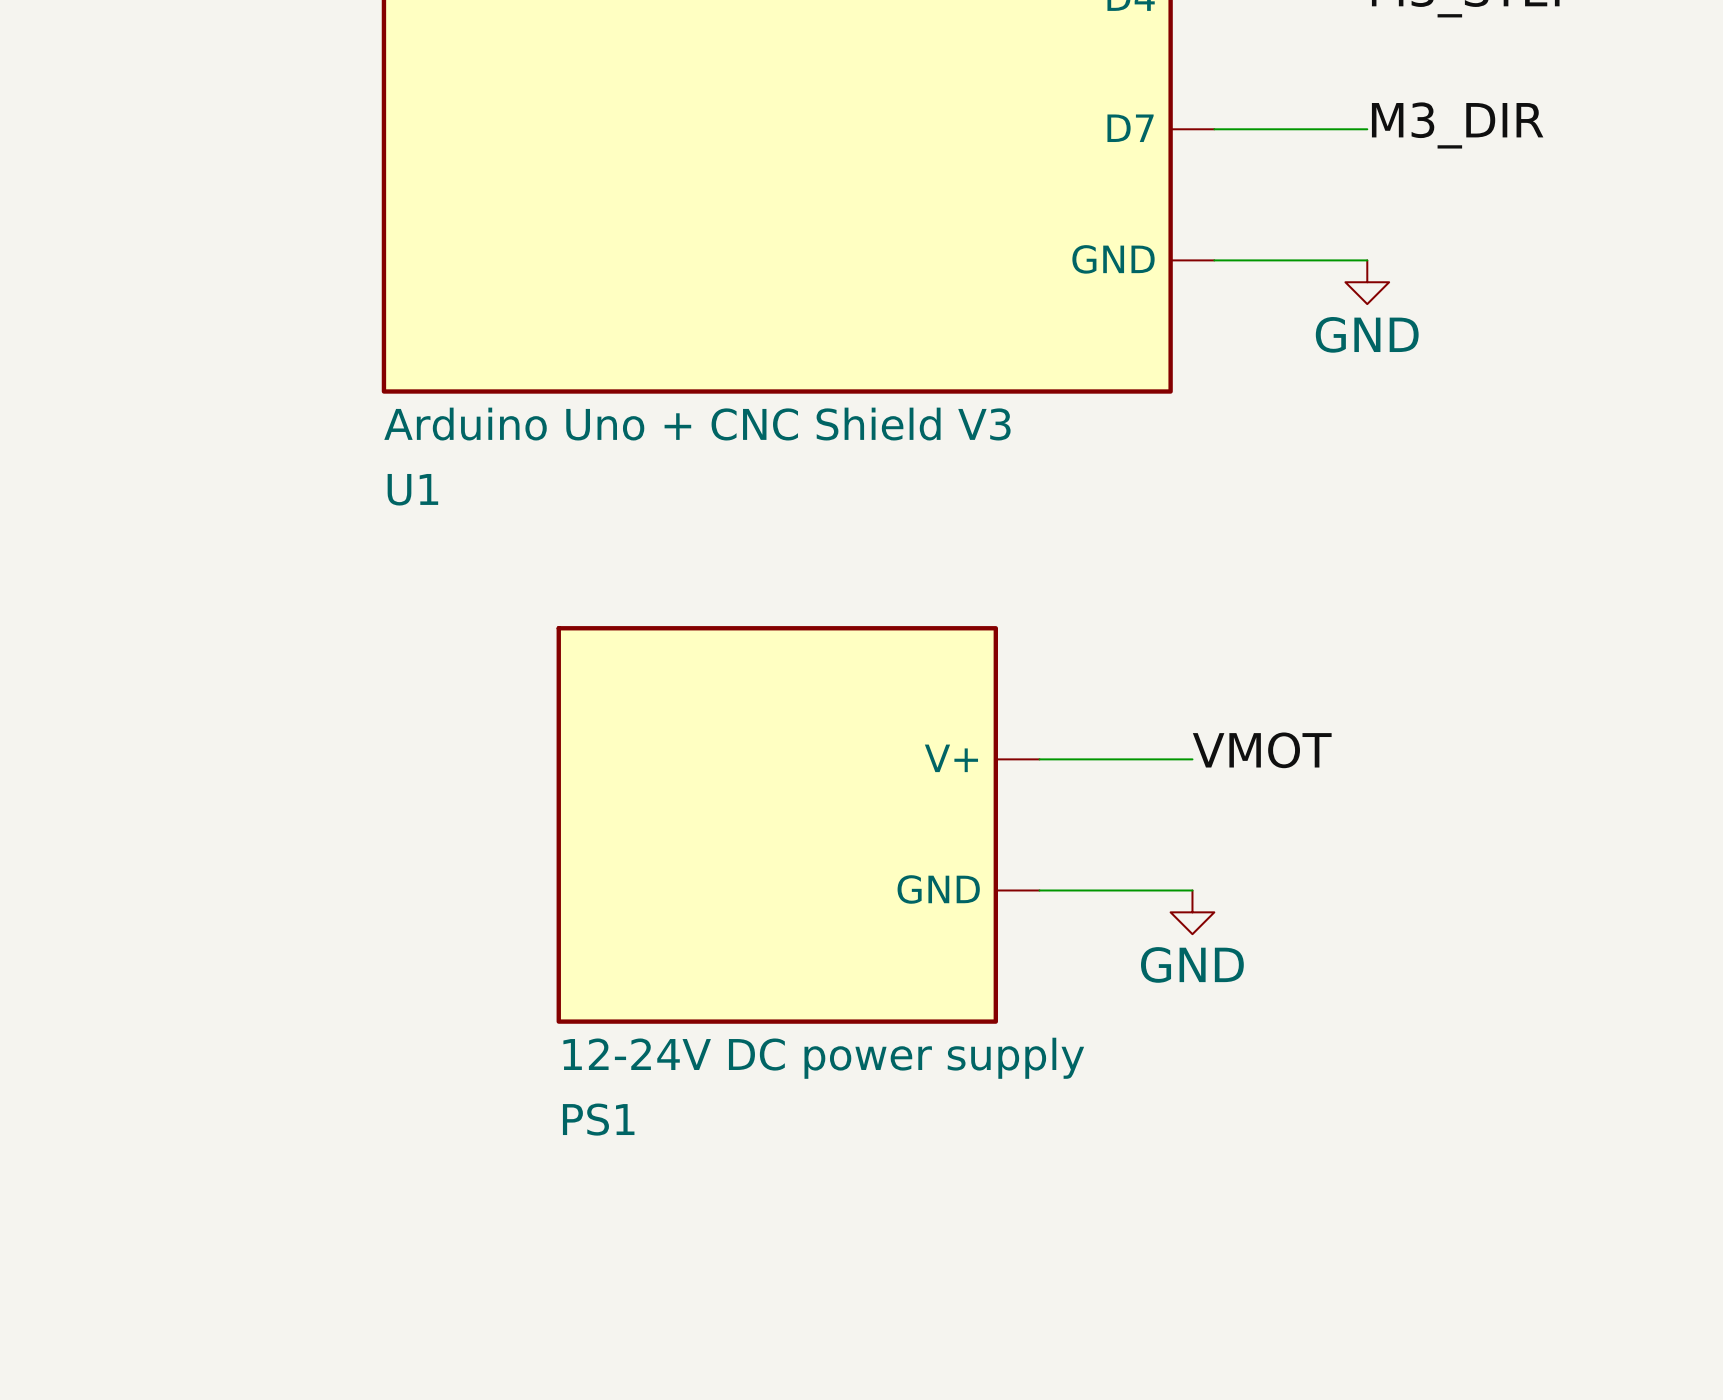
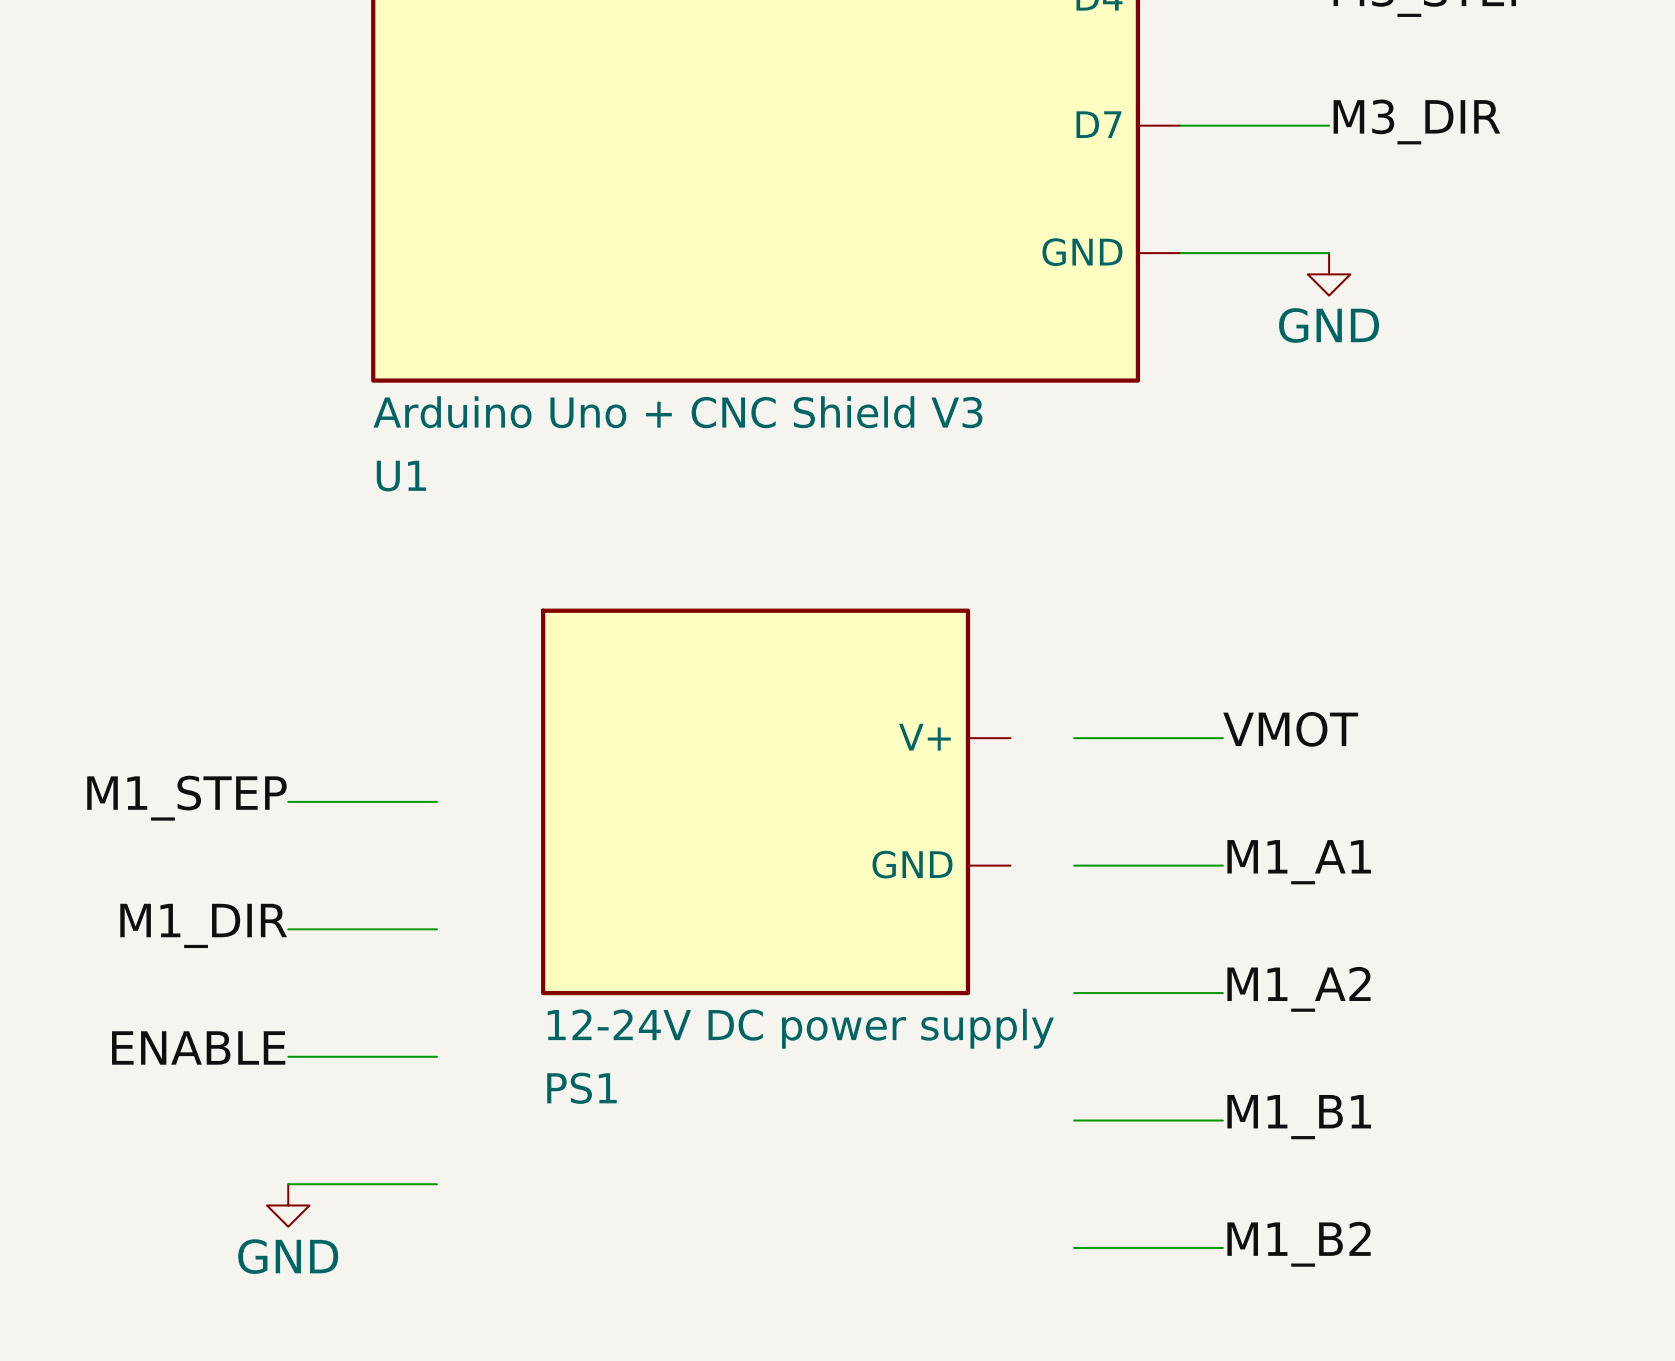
label position: VMOT (1262, 750) -> VMOT (1290, 729)
wire: (1039, 759) (1105, 759) -> (1159, 738) (1222, 738)
label: none -> M1_STEP (186, 798)
wire: none -> (288, 801) (436, 801)
label: none -> M1_A1 (1299, 862)
wire: (1039, 890) (1105, 890) -> (1159, 865) (1222, 865)
power symbol: GND (1192, 912) -> none
label: none -> M1_DIR (203, 925)
wire: none -> (288, 929) (436, 929)
label: none -> M1_A2 (1298, 989)
wire: none -> (1074, 993) (1222, 993)
label: none -> ENABLE (198, 1047)
wire: none -> (288, 1056) (436, 1056)
label: none -> M1_B1 (1299, 1117)
wire: none -> (1074, 1120) (1222, 1120)
wire: none -> (288, 1184) (436, 1184)
power symbol: none -> GND (288, 1205)
label: none -> M1_B2 (1299, 1244)
wire: none -> (1074, 1247) (1222, 1247)

